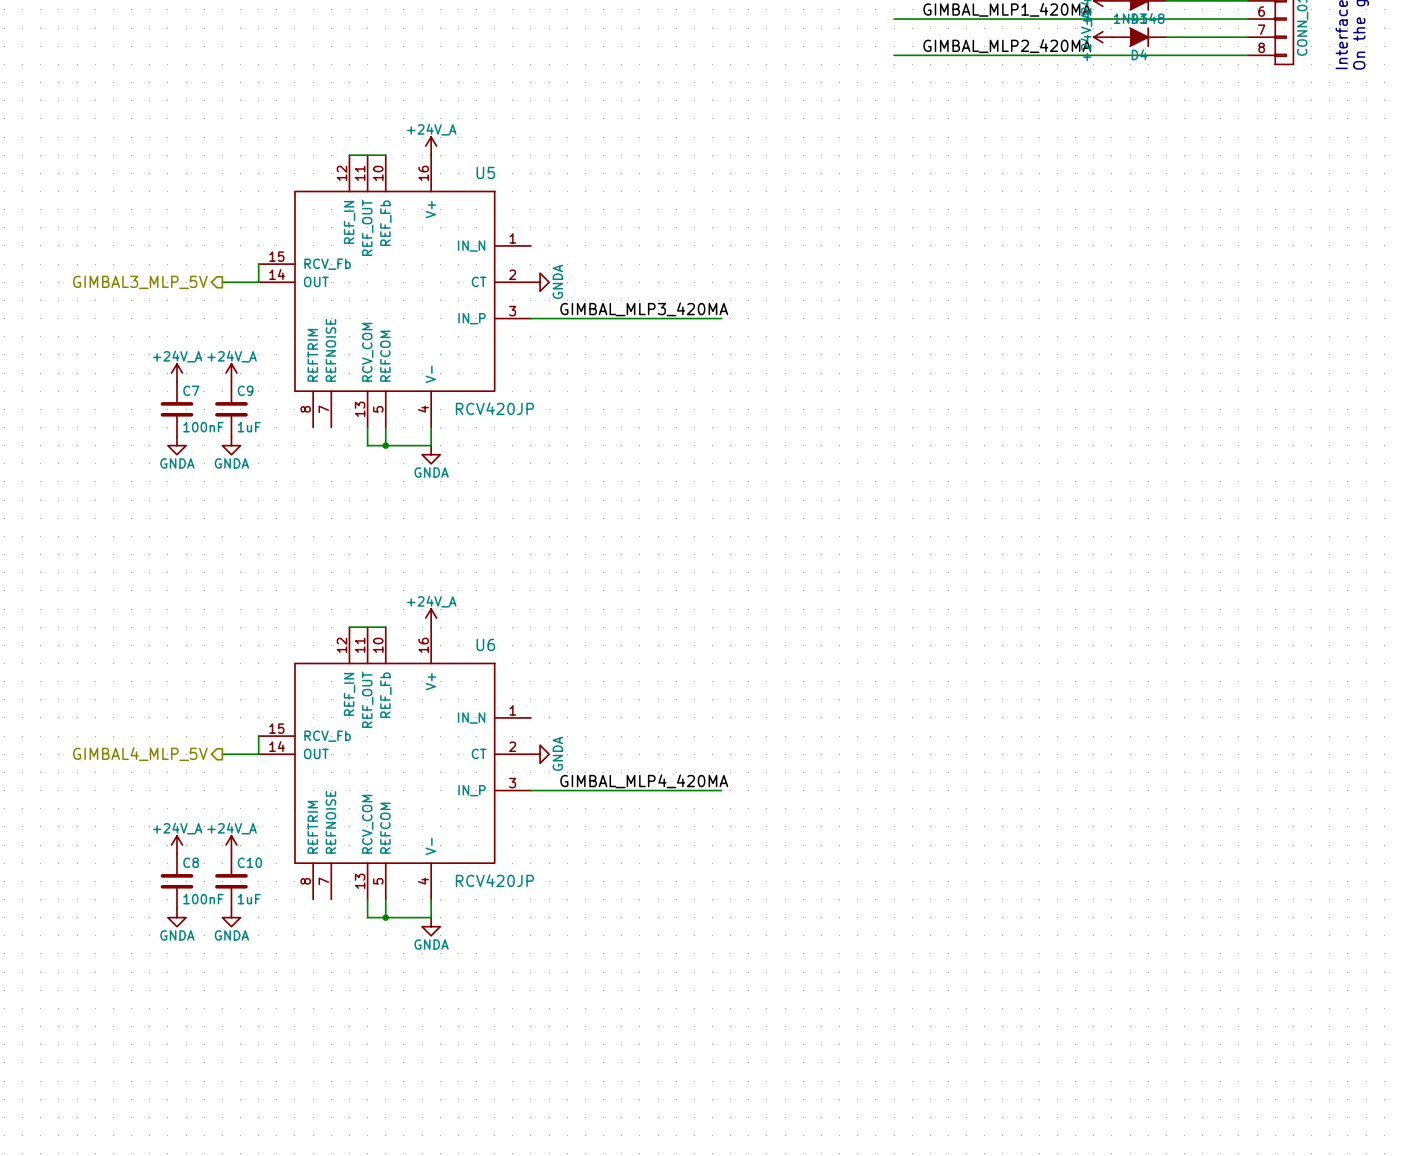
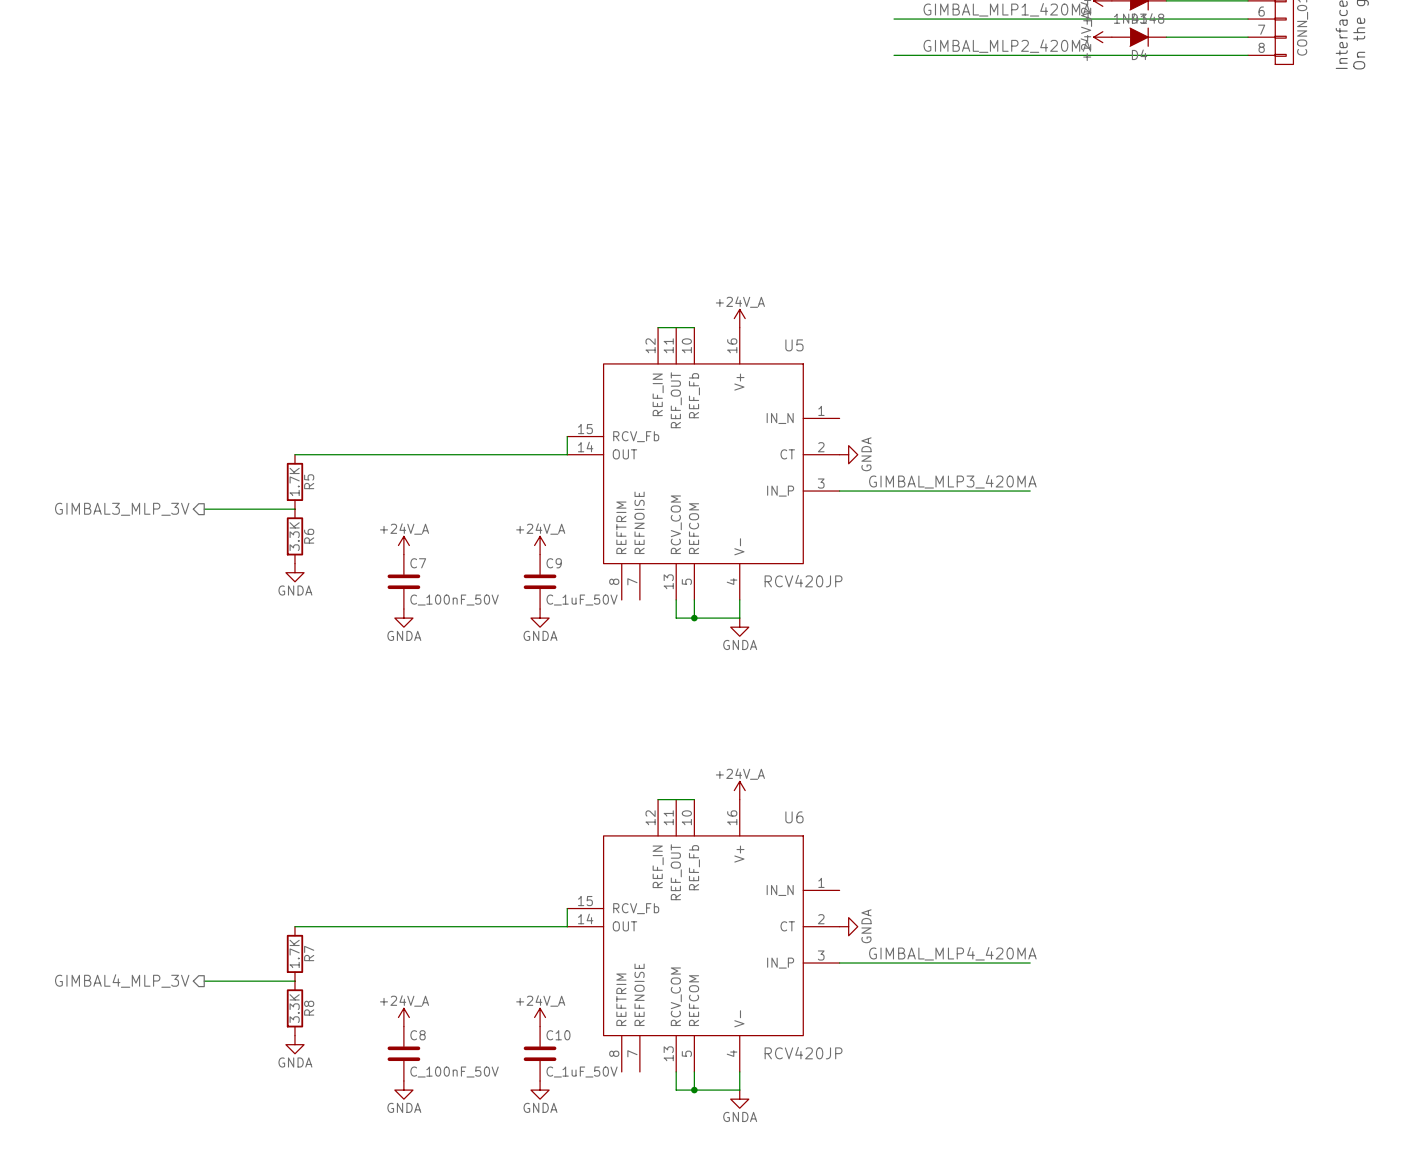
power symbol: +24V_A (431, 146) -> none
wire: (349, 155) (385, 155) -> none
wire: (258, 264) (258, 282) (222, 282) -> none
hierarchical label: GIMBAL3_MLP_5V (140, 282) -> none
power symbol: GNDA (540, 282) -> none
U5 position: (394, 291) -> (703, 463)
label: GIMBAL_MLP3_420MA (644, 309) -> none
wire: (530, 318) (721, 318) -> none
power symbol: none -> +24V_A (739, 318)
wire: none -> (658, 327) (694, 327)
power symbol: +24V_A (176, 373) -> none
power symbol: +24V_A (231, 373) -> none
C7 position: (176, 409) -> (403, 581)
C9 position: (231, 409) -> (540, 581)
C7 value: 100nF (203, 427) -> C_100nF_50V (454, 600)
C9 value: 1uF (249, 427) -> C_1uF_50V (582, 600)
wire: (367, 427) (367, 445) (431, 445) (431, 427) -> none
wire: (385, 427) (385, 445) -> none
wire: none -> (567, 436) (567, 454) (294, 454)
power symbol: GNDA (176, 445) -> none
power symbol: GNDA (231, 445) -> none
junction: (385, 445) -> none
power symbol: GNDA (431, 454) -> none
power symbol: none -> GNDA (848, 454)
R5: none -> 1.7K (294, 481)
label: none -> GIMBAL_MLP3_420MA (952, 481)
wire: none -> (839, 491) (1030, 491)
hierarchical label: none -> GIMBAL3_MLP_3V (122, 509)
wire: none -> (204, 509) (294, 509)
R6: none -> 3.3K (294, 536)
power symbol: none -> +24V_A (403, 545)
power symbol: none -> +24V_A (540, 545)
power symbol: none -> GNDA (294, 572)
wire: none -> (676, 599) (676, 618) (739, 618) (739, 599)
wire: none -> (694, 599) (694, 618)
power symbol: none -> GNDA (403, 618)
power symbol: +24V_A (431, 618) -> none
power symbol: none -> GNDA (540, 618)
junction: none -> (694, 618)
wire: (349, 627) (385, 627) -> none
power symbol: none -> GNDA (739, 627)
wire: (258, 736) (258, 754) (222, 754) -> none
hierarchical label: GIMBAL4_MLP_5V (140, 754) -> none
power symbol: GNDA (540, 754) -> none
U6 position: (394, 763) -> (703, 935)
label: GIMBAL_MLP4_420MA (644, 781) -> none
wire: (530, 790) (721, 790) -> none
power symbol: none -> +24V_A (739, 790)
wire: none -> (658, 799) (694, 799)
power symbol: +24V_A (176, 845) -> none
power symbol: +24V_A (231, 845) -> none
C8 position: (176, 881) -> (403, 1053)
C10 position: (231, 881) -> (540, 1053)
C8 value: 100nF (203, 899) -> C_100nF_50V (454, 1072)
C10 value: 1uF (249, 899) -> C_1uF_50V (582, 1072)
wire: (367, 899) (367, 917) (431, 917) (431, 899) -> none
wire: (385, 899) (385, 917) -> none
wire: none -> (567, 908) (567, 926) (294, 926)
power symbol: GNDA (176, 917) -> none
power symbol: GNDA (231, 917) -> none
junction: (385, 917) -> none
power symbol: GNDA (431, 926) -> none
power symbol: none -> GNDA (848, 926)
R7: none -> 1.7K (294, 953)
label: none -> GIMBAL_MLP4_420MA (952, 953)
wire: none -> (839, 963) (1030, 963)
hierarchical label: none -> GIMBAL4_MLP_3V (122, 981)
wire: none -> (204, 981) (294, 981)
R8: none -> 3.3K (294, 1008)
power symbol: none -> +24V_A (403, 1017)
power symbol: none -> +24V_A (540, 1017)
power symbol: none -> GNDA (294, 1044)
wire: none -> (676, 1071) (676, 1090) (739, 1090) (739, 1071)
wire: none -> (694, 1071) (694, 1090)
power symbol: none -> GNDA (403, 1090)
power symbol: none -> GNDA (540, 1090)
junction: none -> (694, 1090)
power symbol: none -> GNDA (739, 1099)

